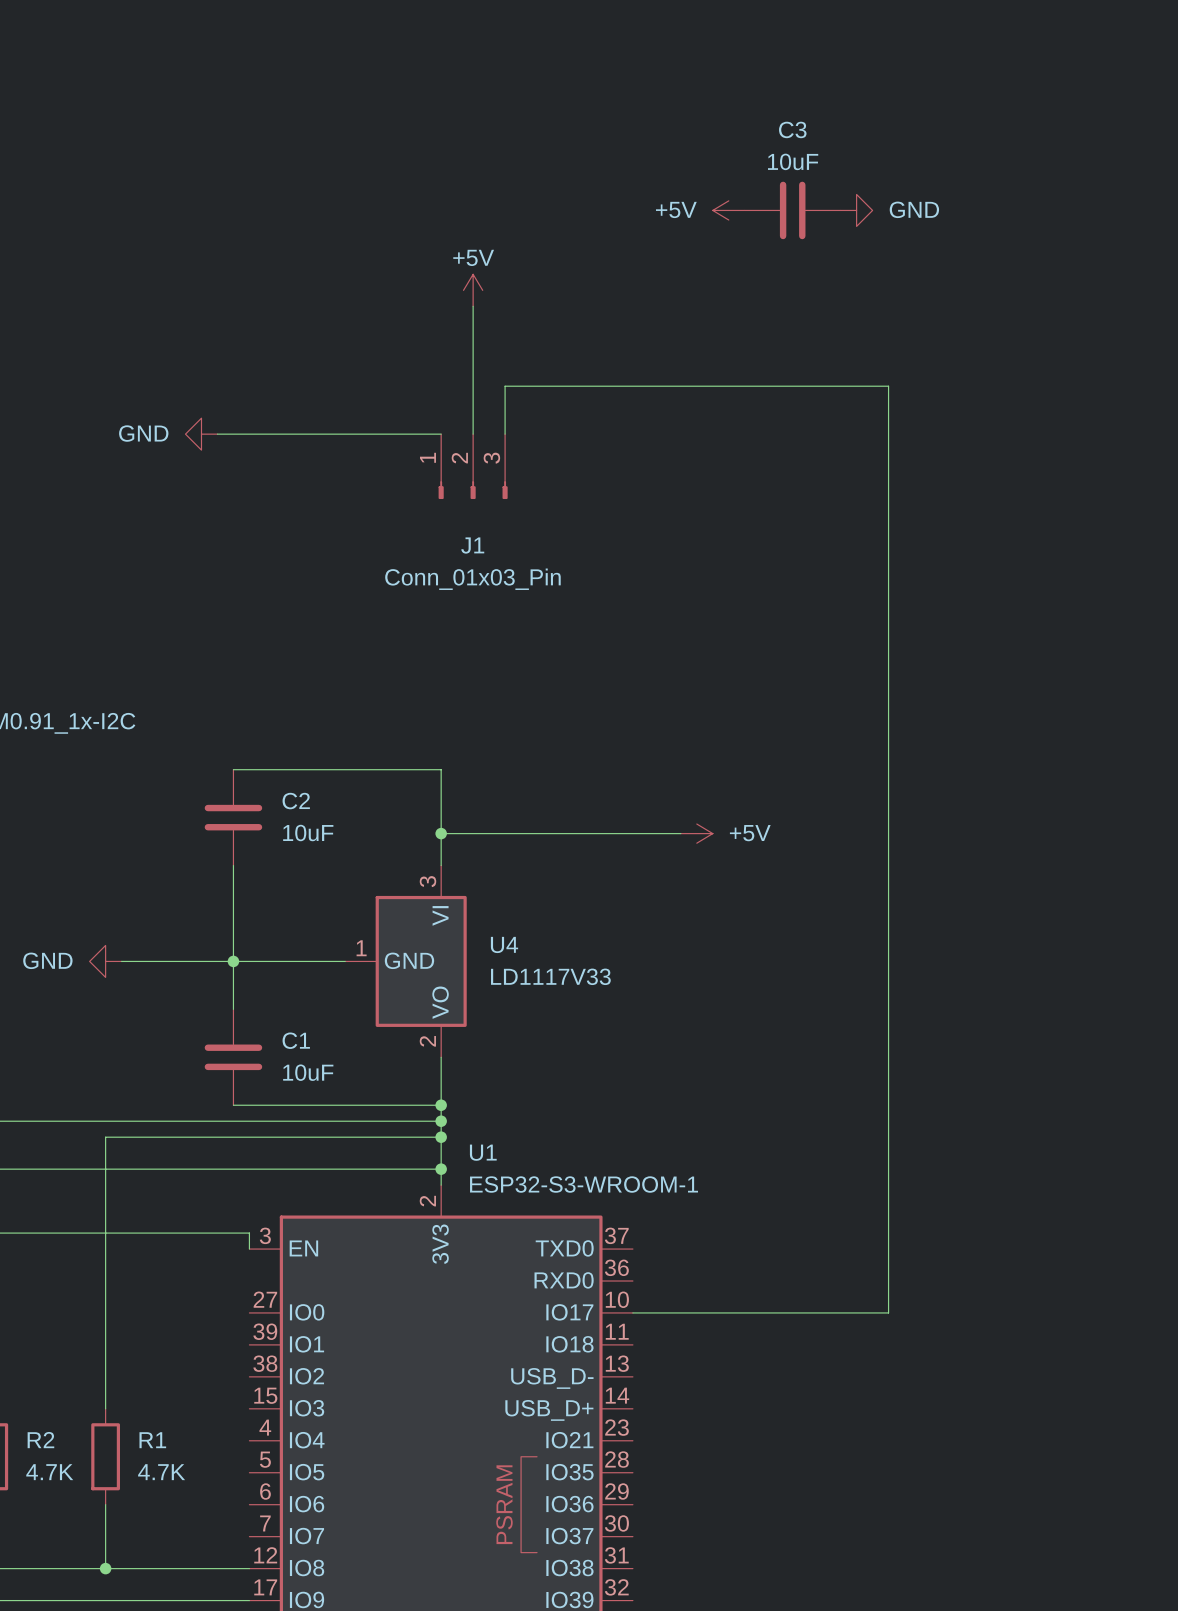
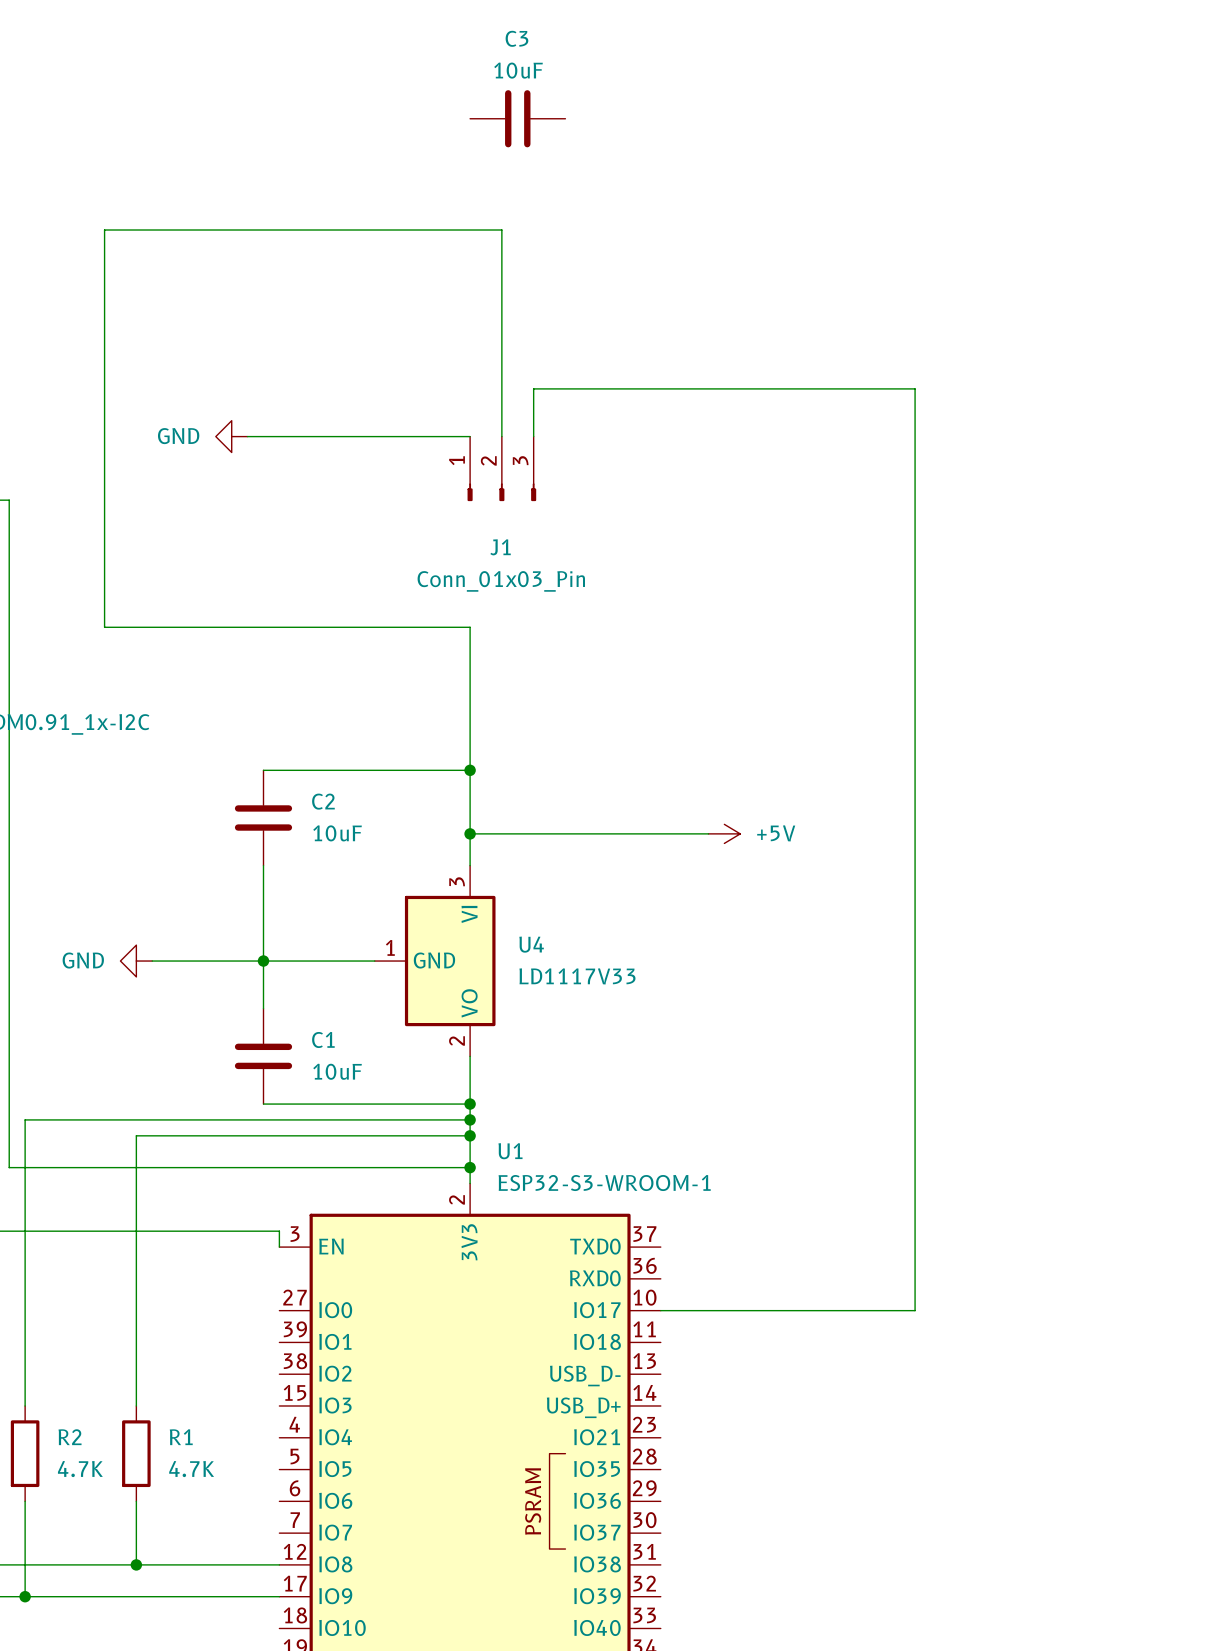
power symbol: +5V (728, 210) -> none
C3 position: (792, 210) -> (517, 118)
power symbol: GND (856, 210) -> none
power symbol: +5V (473, 290) -> none
wire: none -> (501, 309) (501, 230) (104, 230) (104, 627) (470, 627) (470, 770)
junction: none -> (470, 770)

